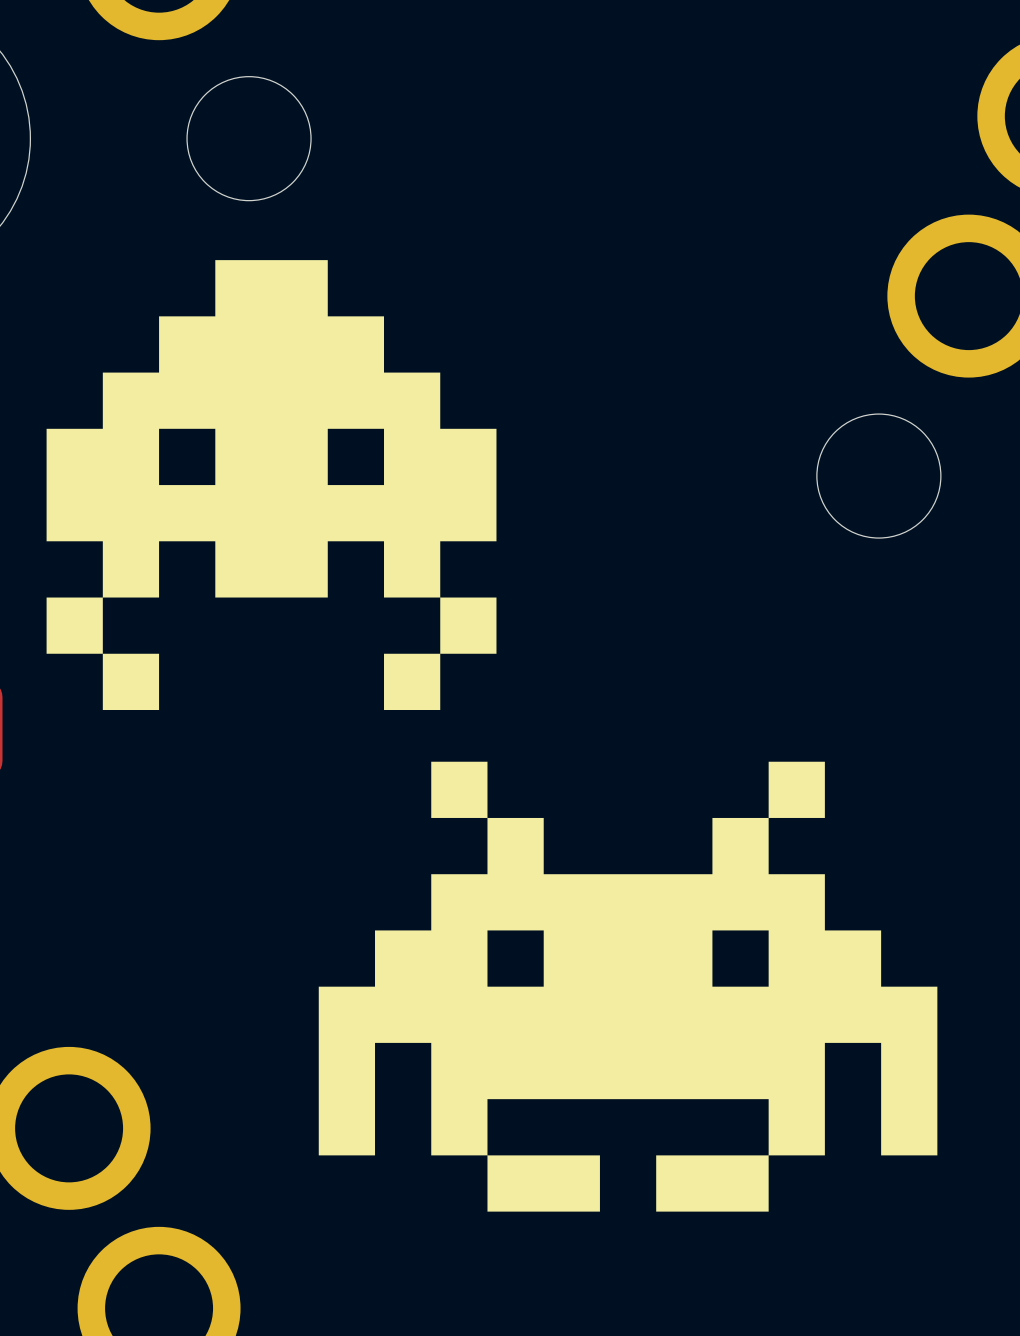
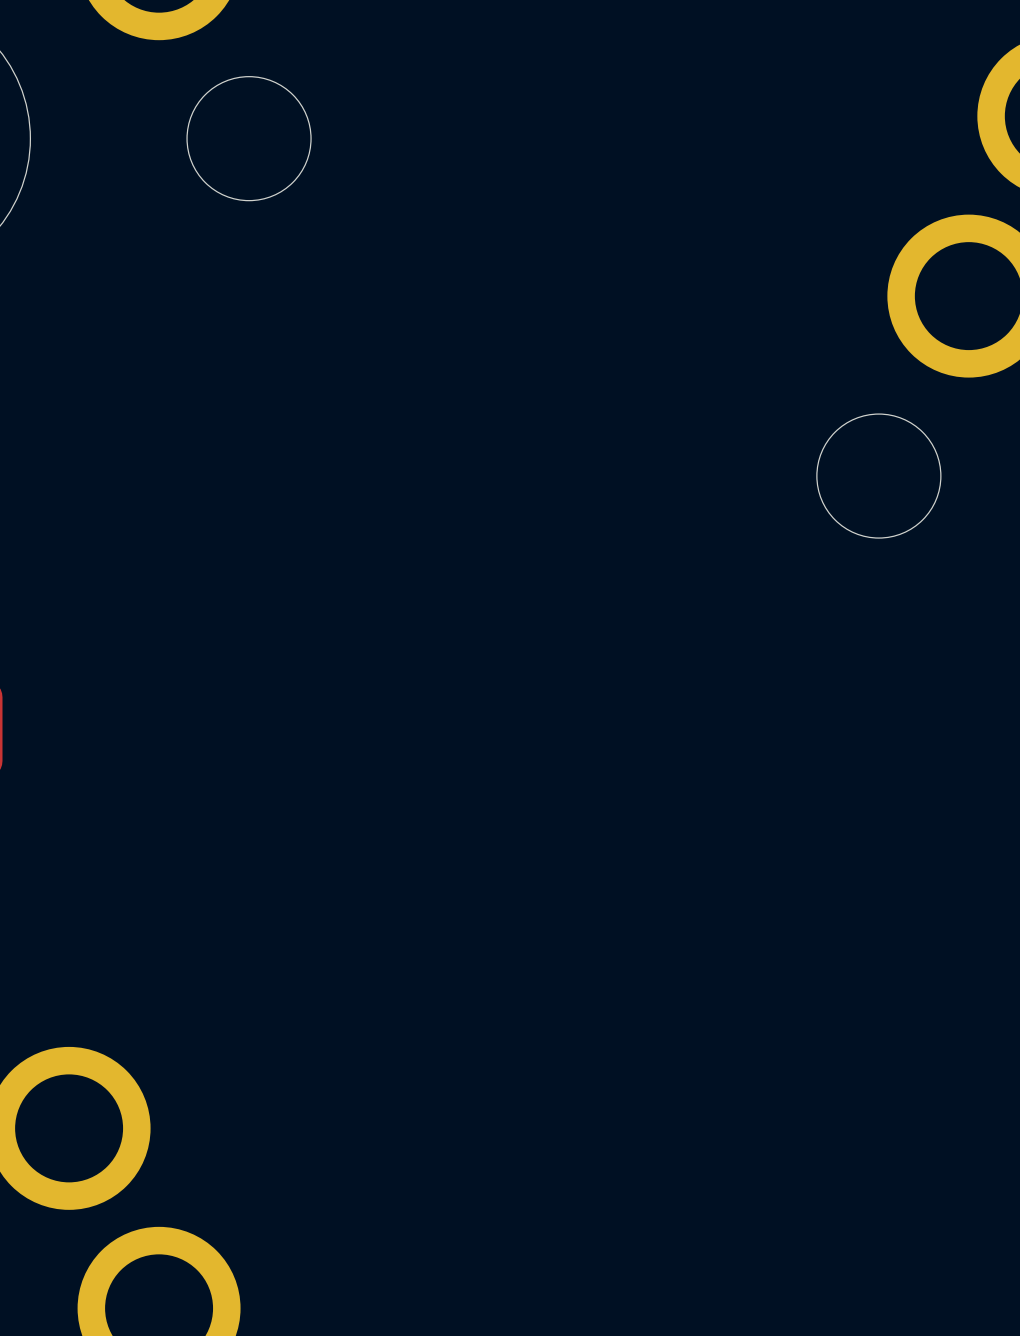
drawing: [46, 260, 938, 1212] -> none

